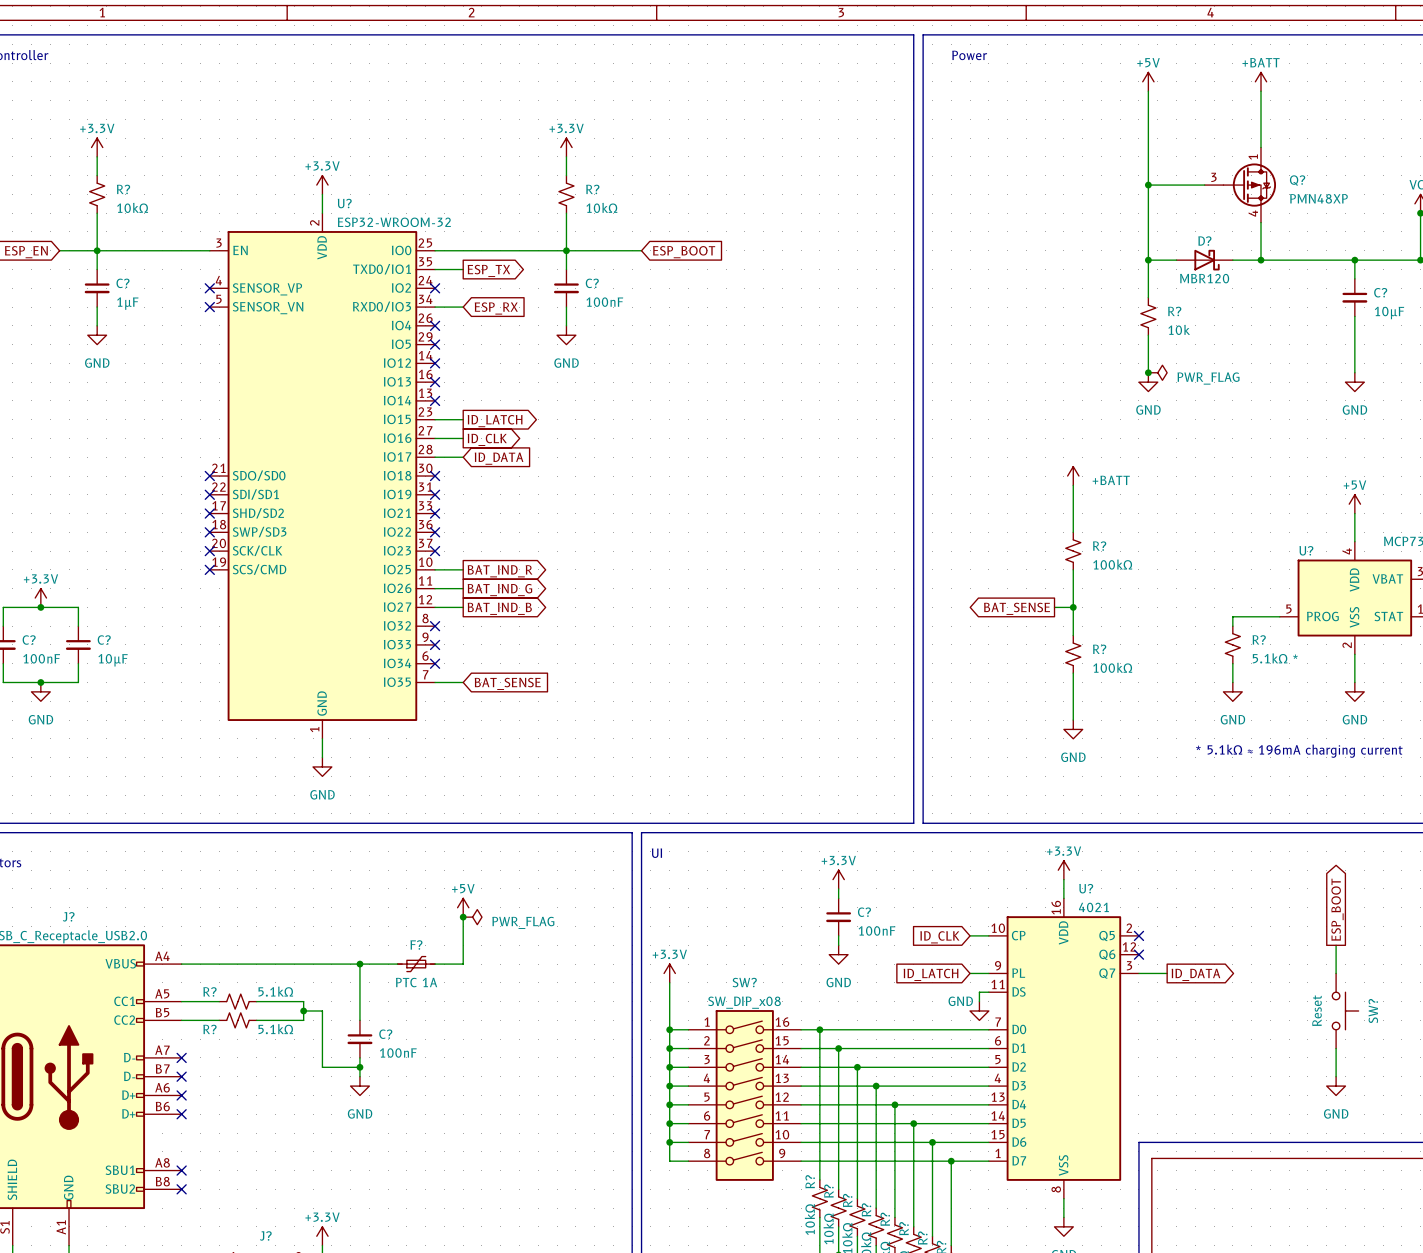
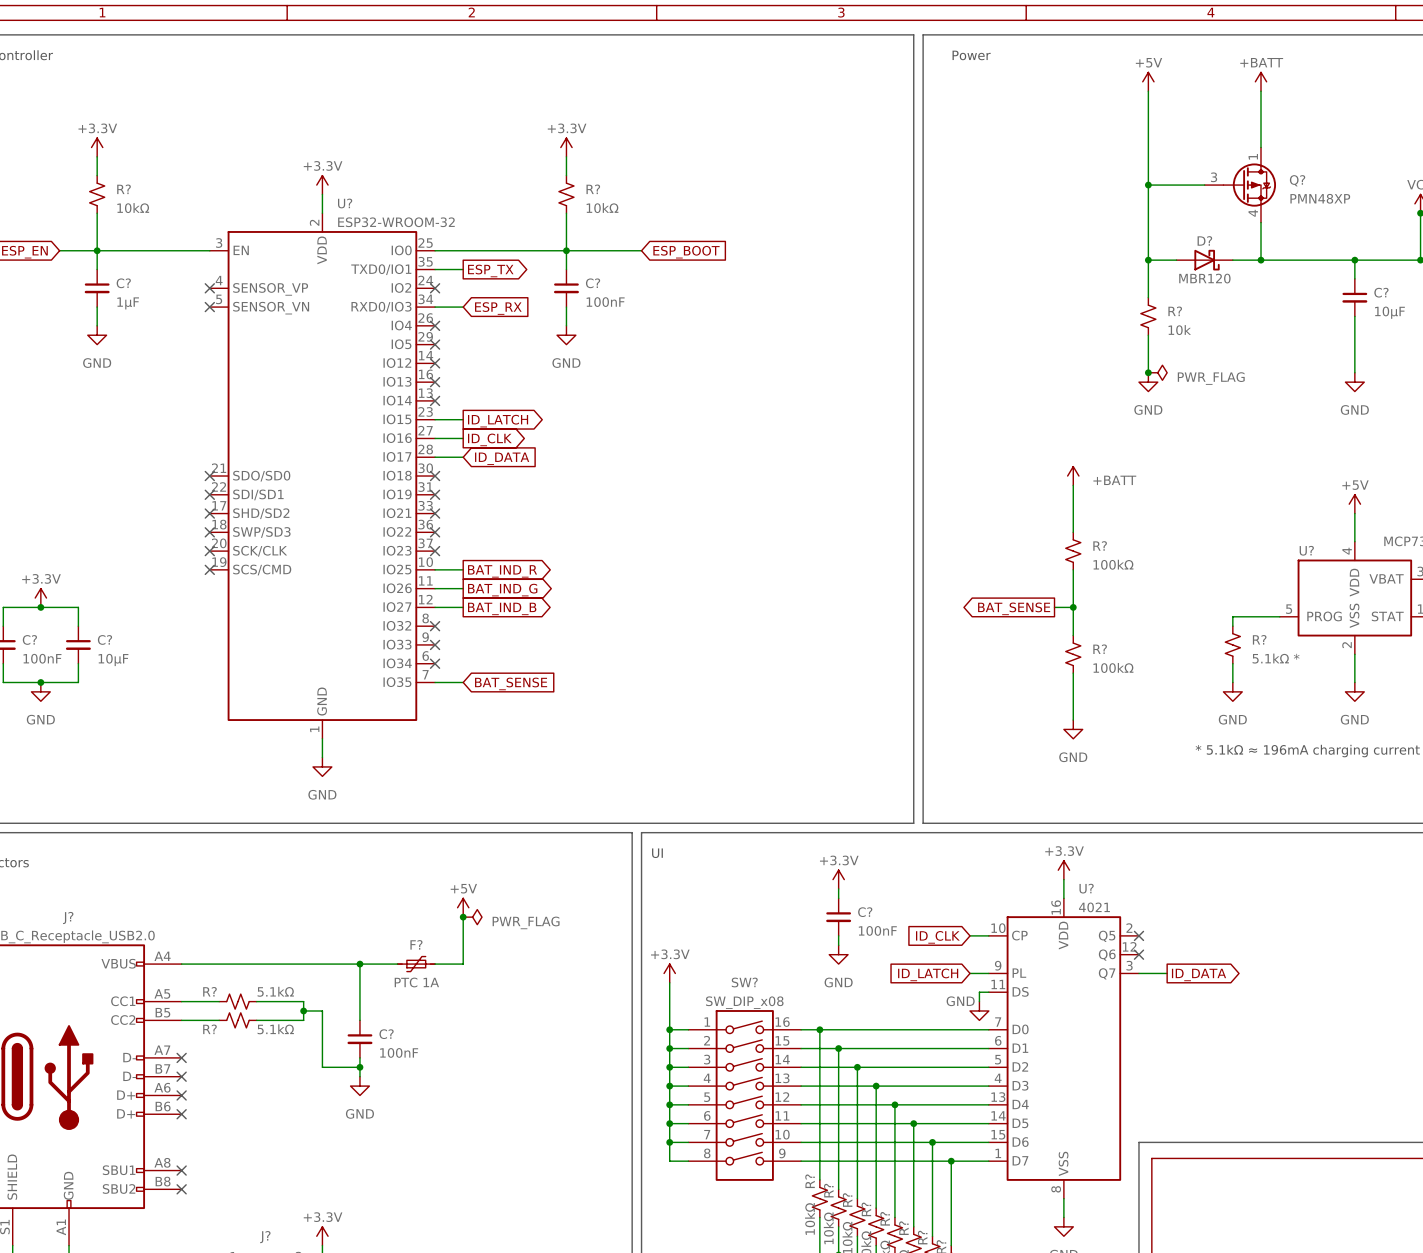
global label: ESP_BOOT (1337, 909) -> none
wire: (1336, 945) (1336, 973) -> none
SW?: Reset (1345, 1010) -> none
wire: (1336, 1048) (1336, 1076) -> none
power symbol: GND (1336, 1086) -> none

